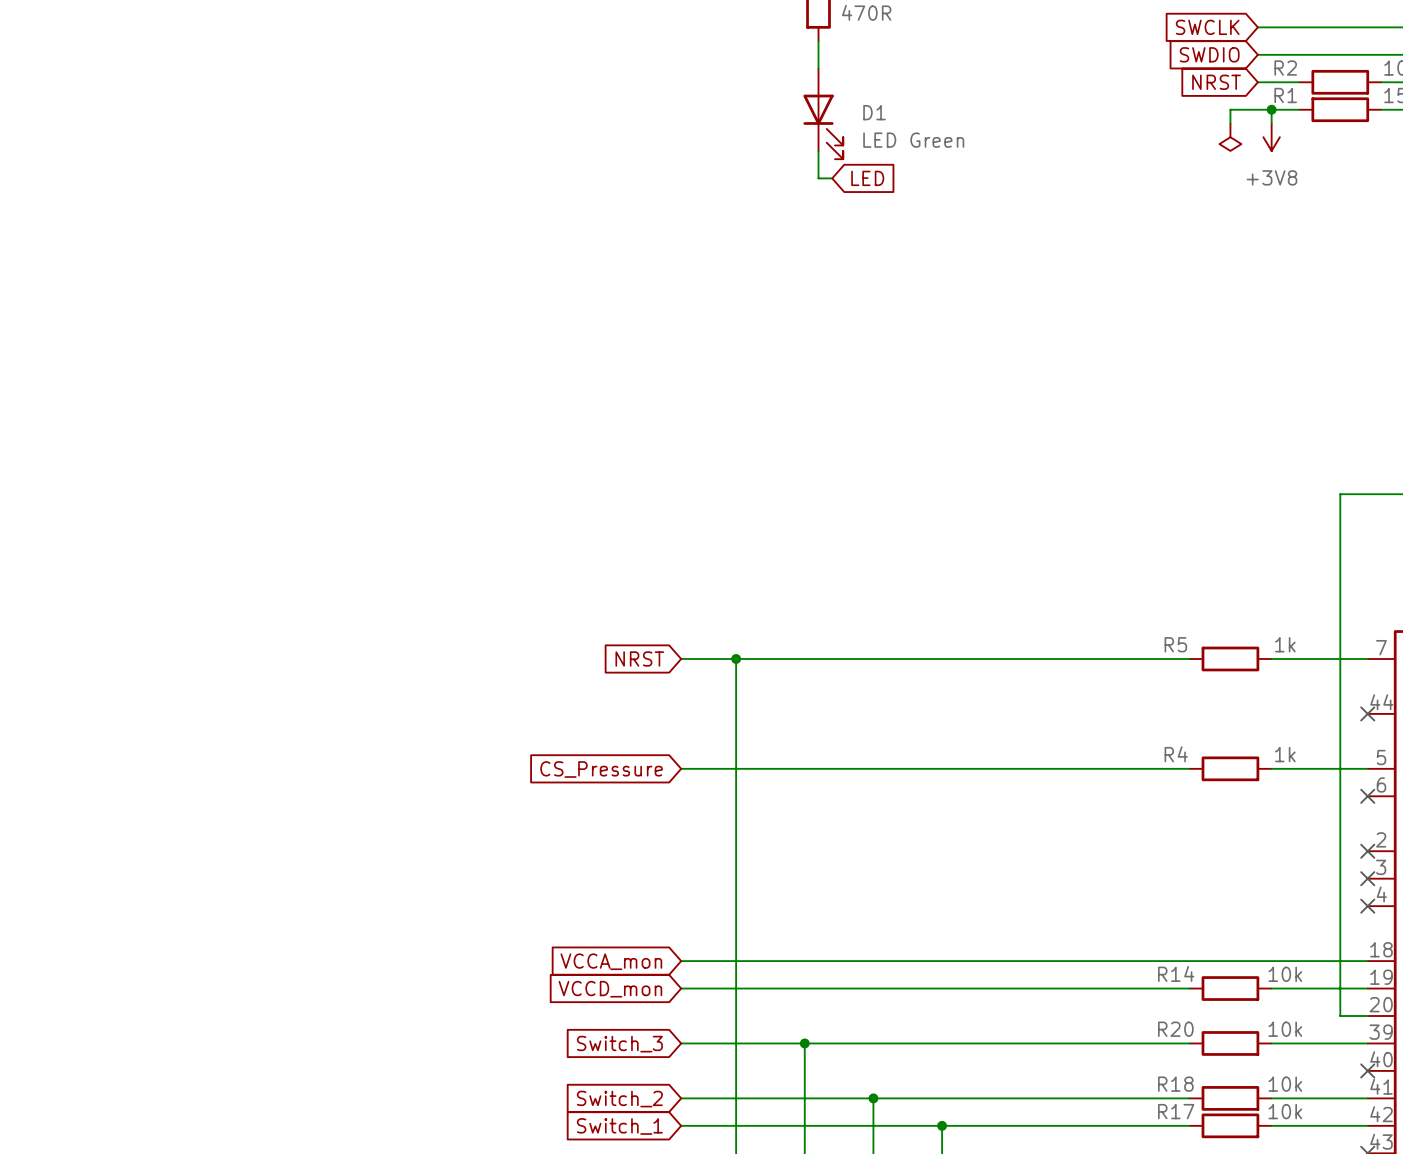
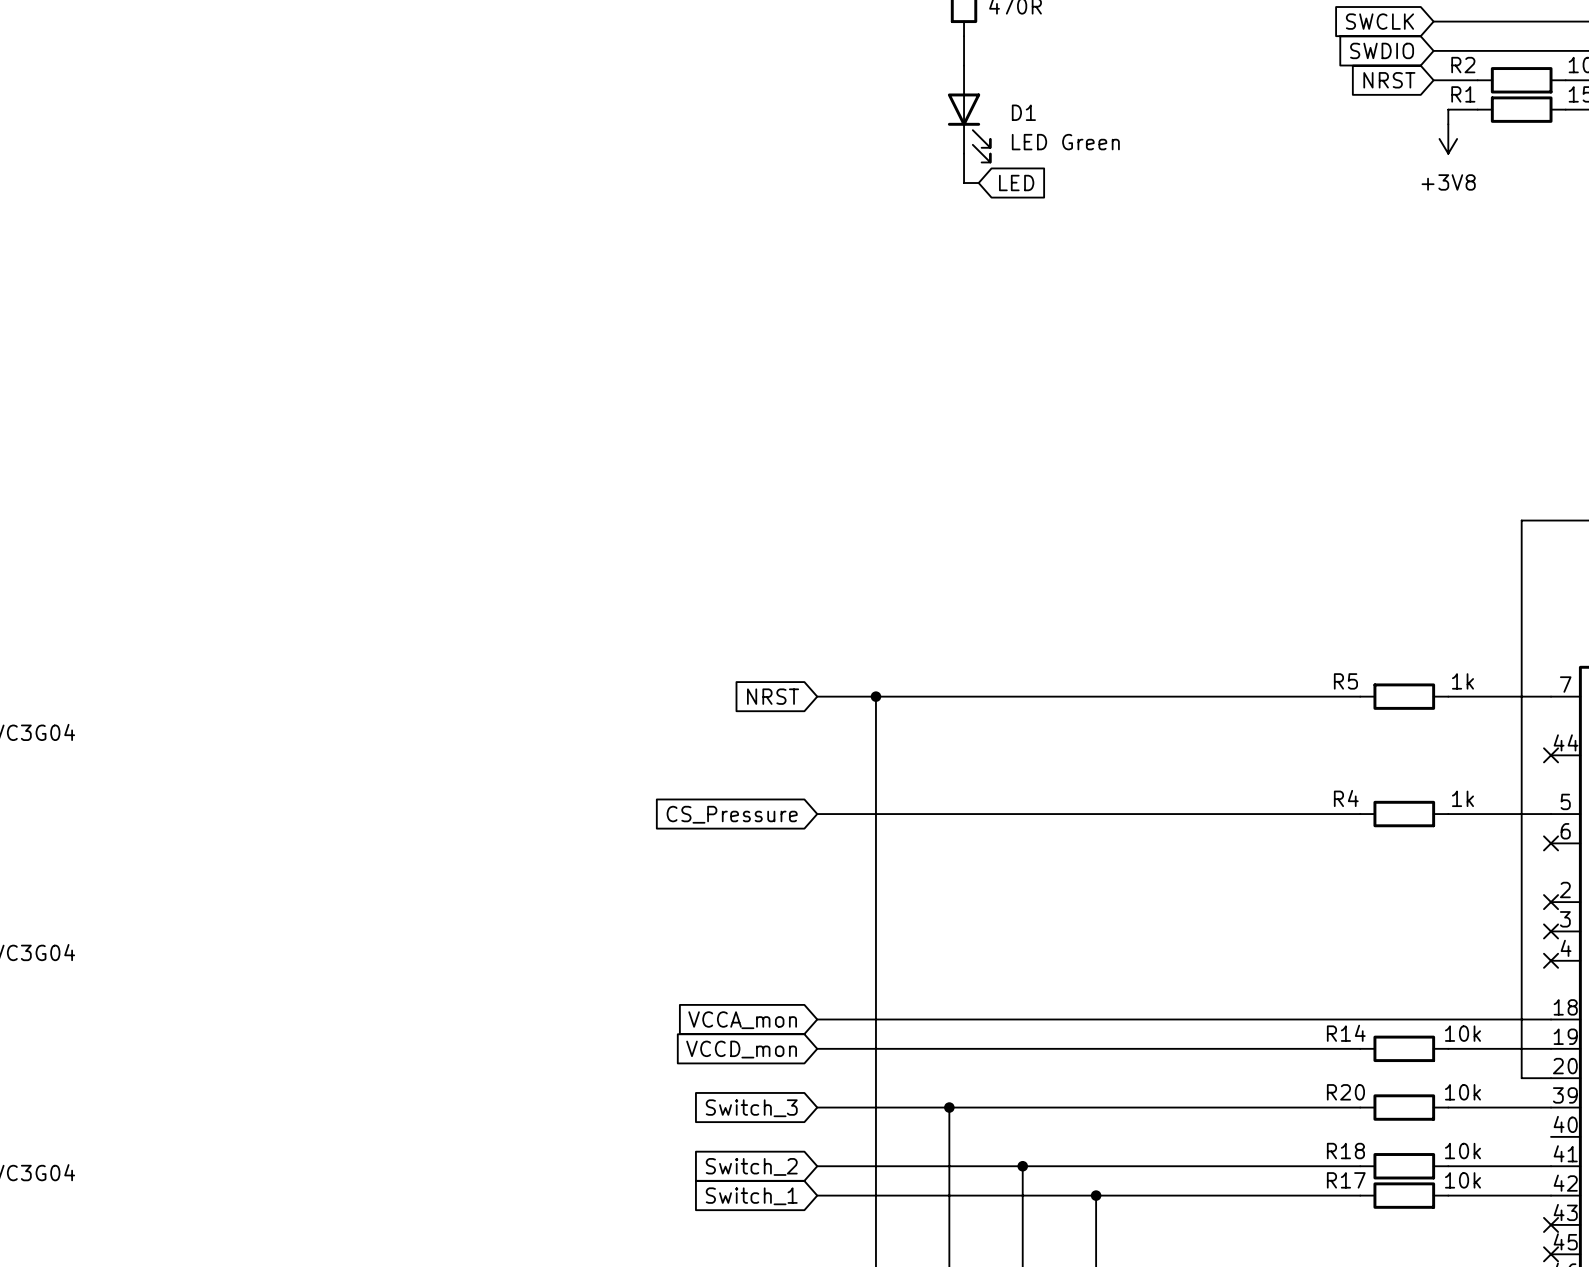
wire: (1271, 109) (1230, 109) (1230, 123) -> none
junction: (1271, 109) -> none
power symbol: (1230, 137) -> none
no-connect mark: (1367, 1070) -> none

